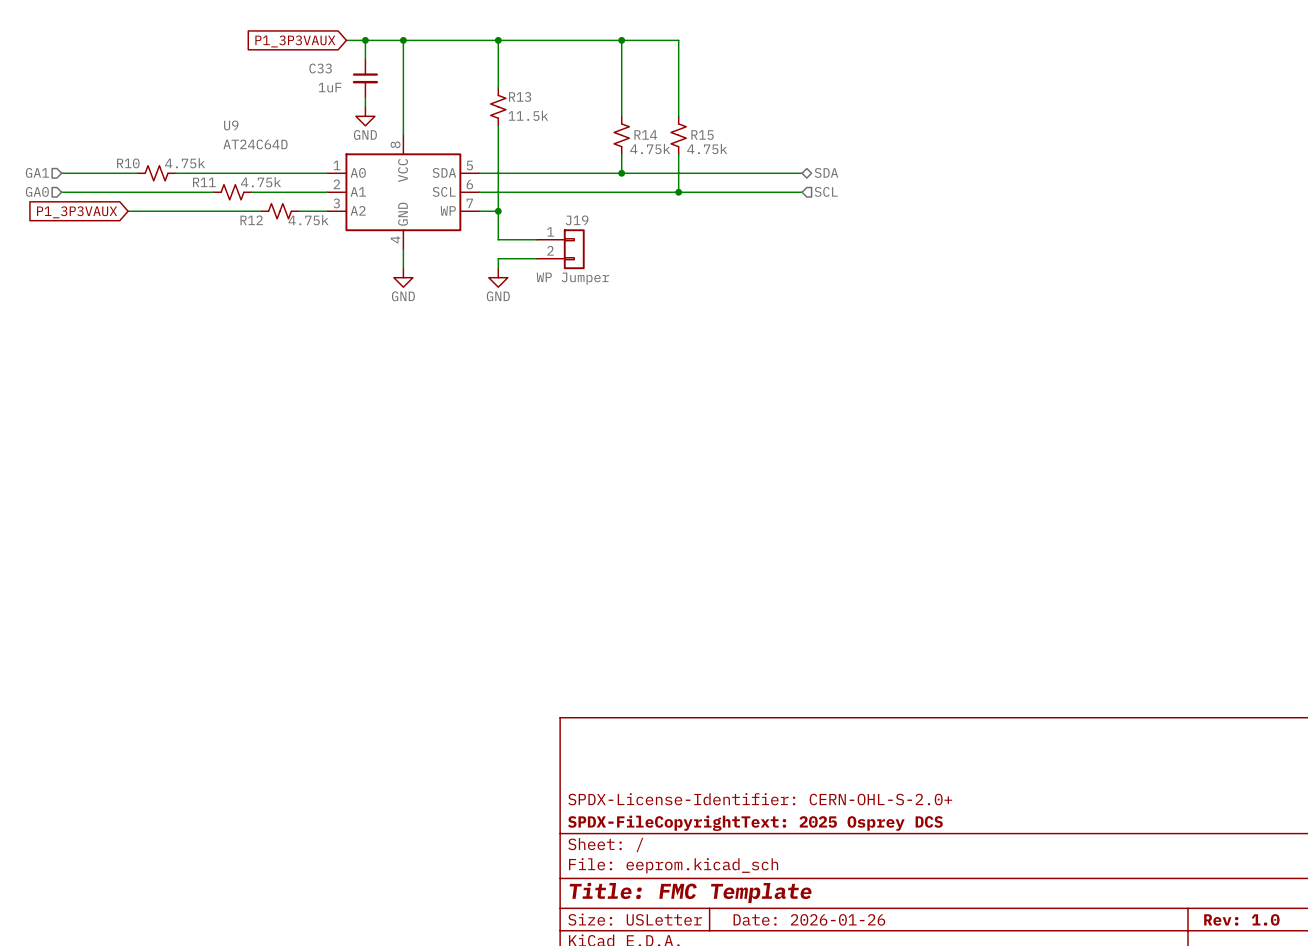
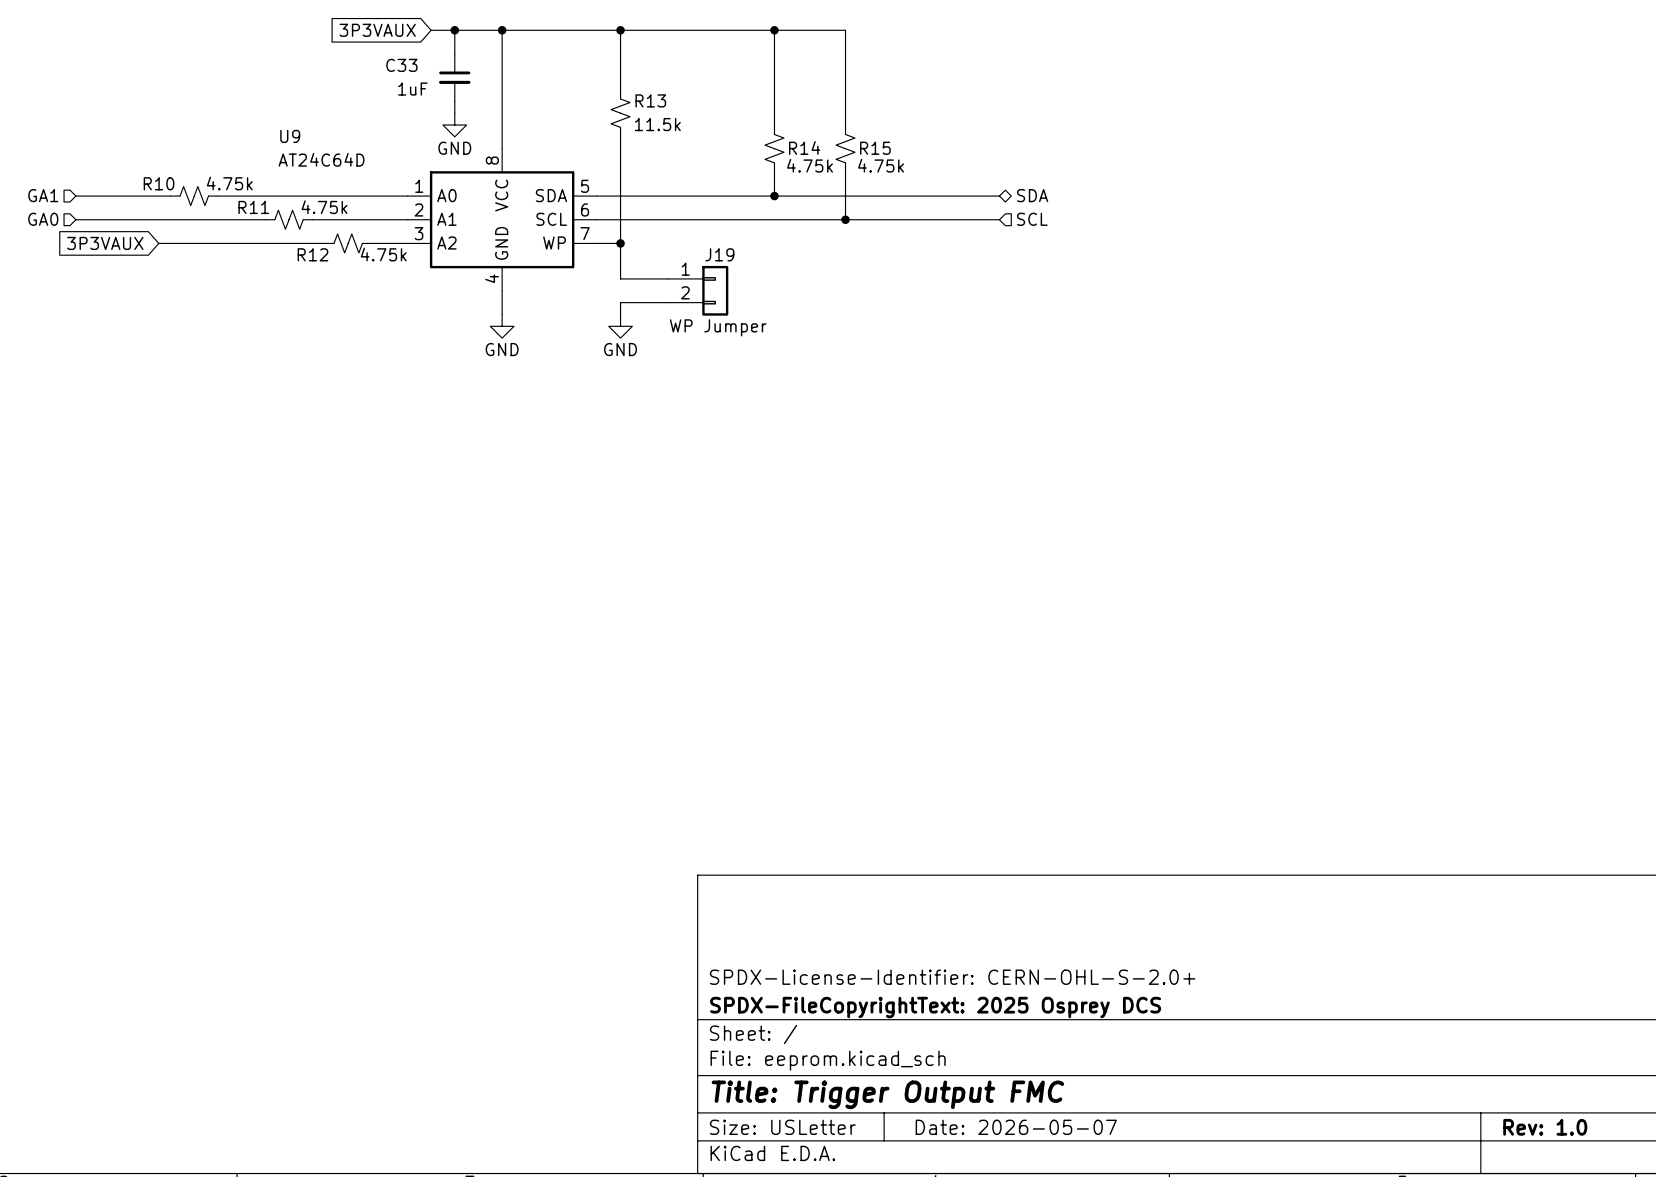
global label: P1_3P3VAUX (295, 41) -> 3P3VAUX (377, 30)
global label: P1_3P3VAUX (77, 212) -> 3P3VAUX (105, 243)
title block: Title: FMC Template (690, 892) -> Title: Trigger Output FMC (887, 1094)
title block: Date: 2026-01-26 (809, 919) -> Date: 2026-05-07 (1016, 1127)

